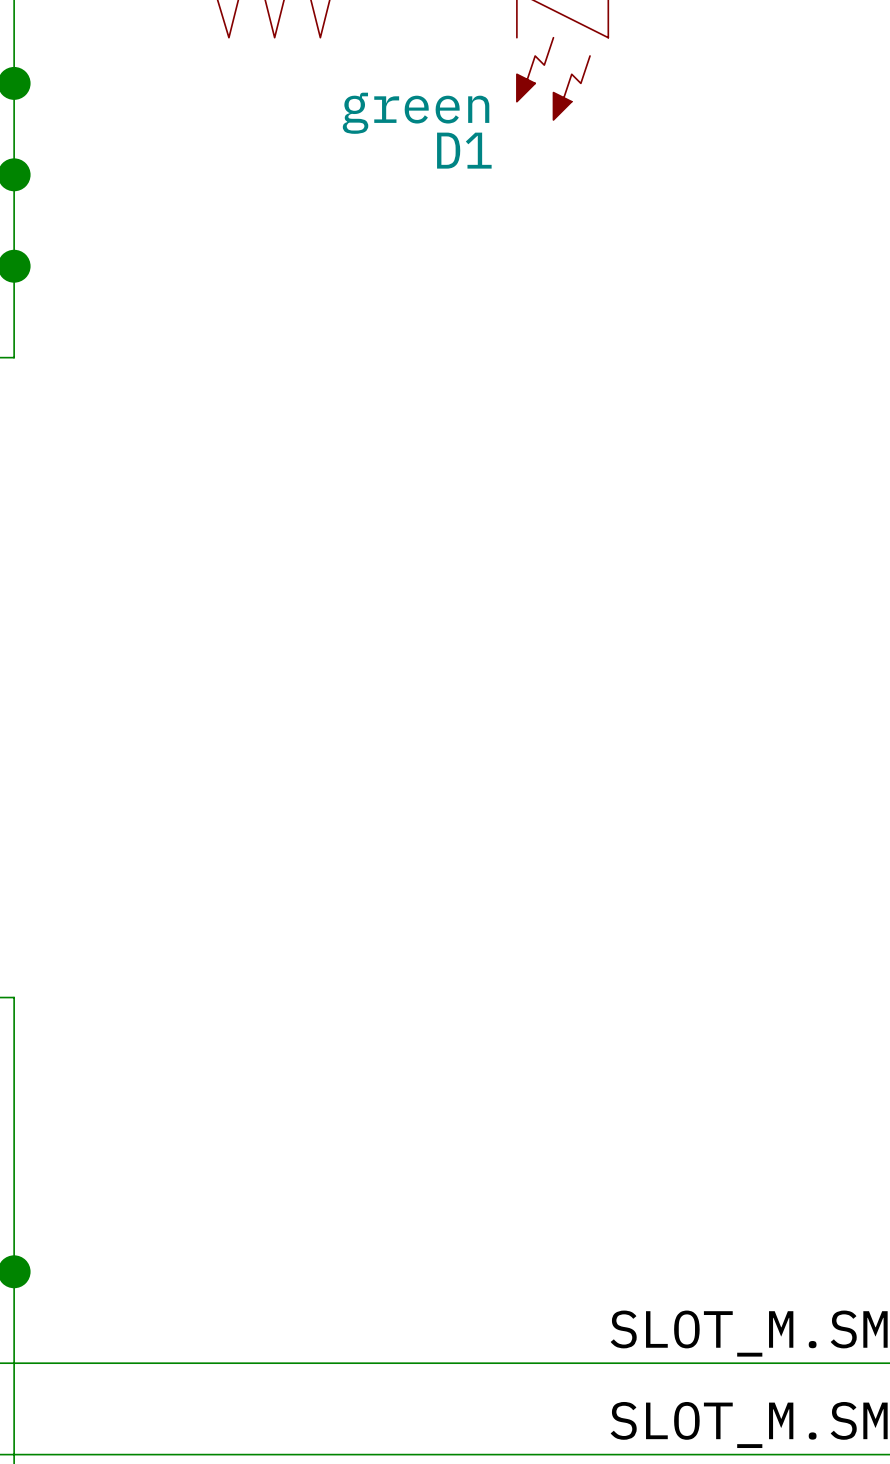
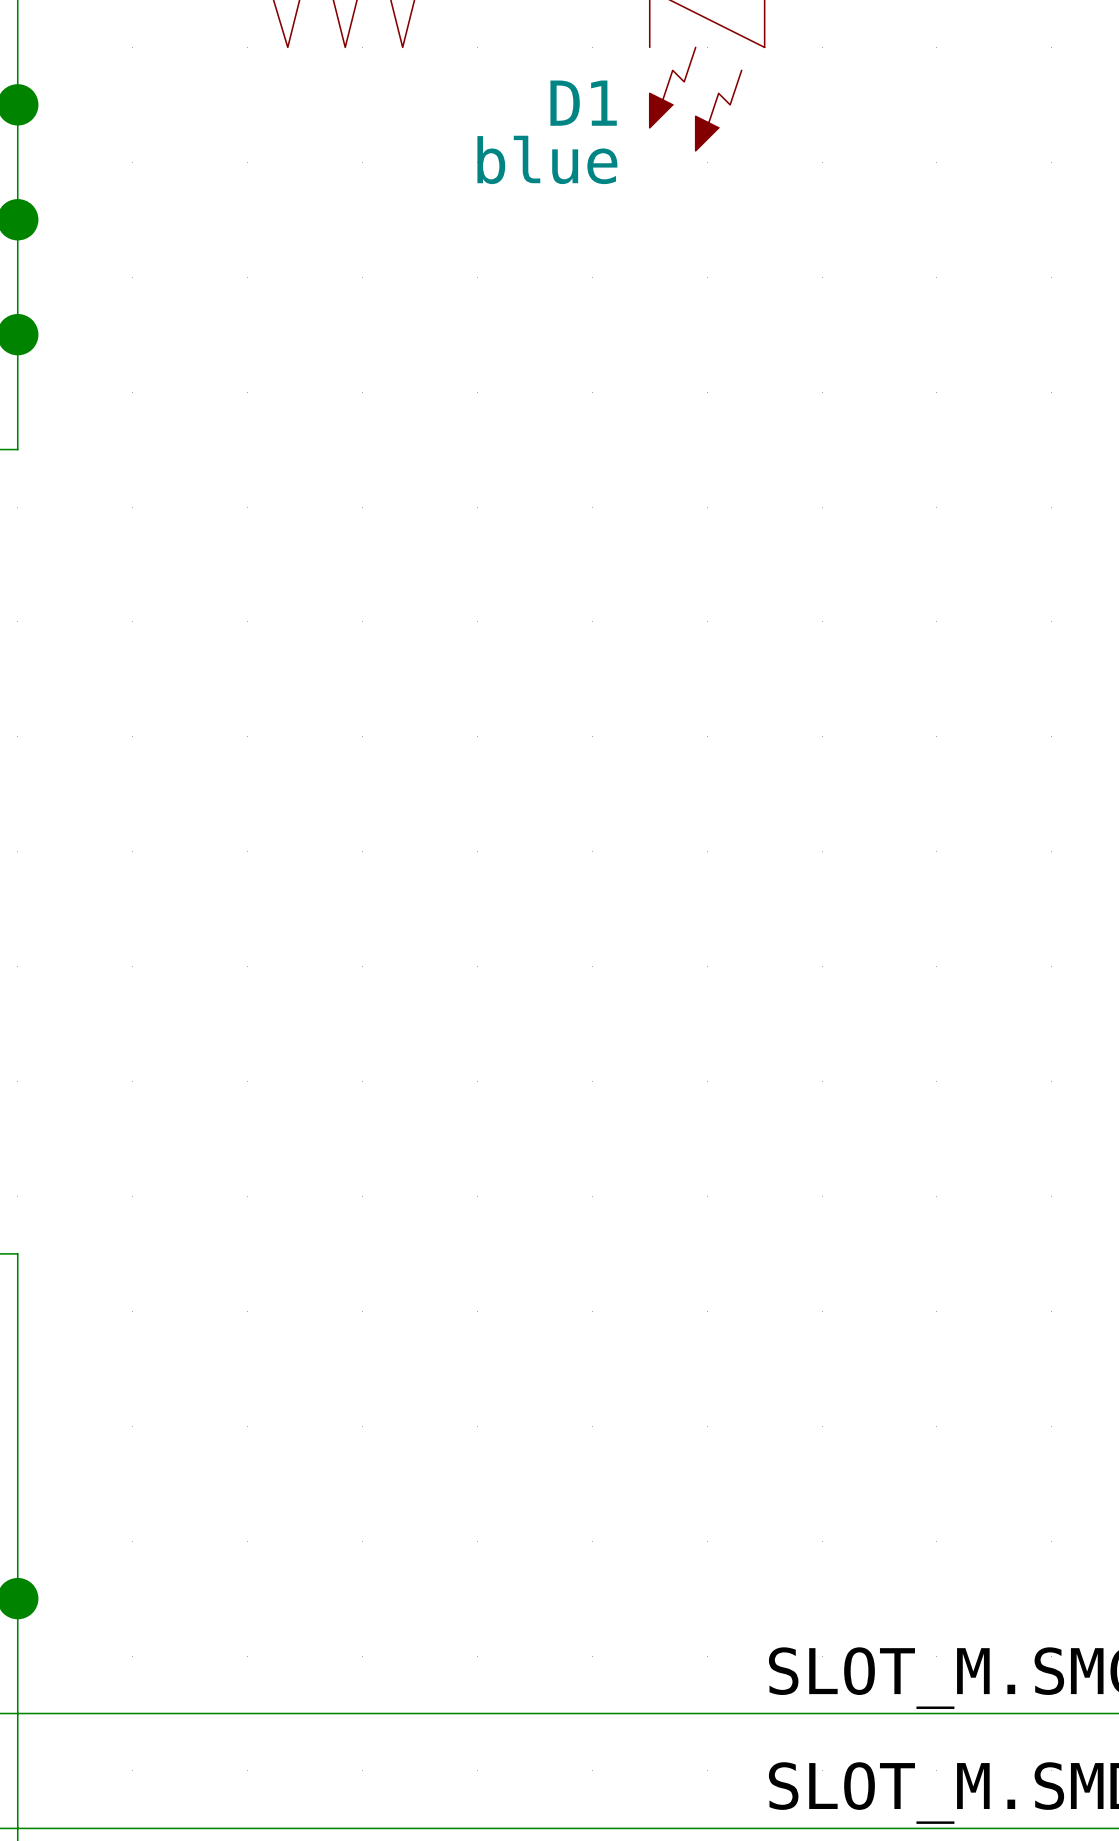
D1 value: green (416, 113) -> blue (547, 159)
D1 name position: D1 (464, 150) -> D1 (583, 103)

